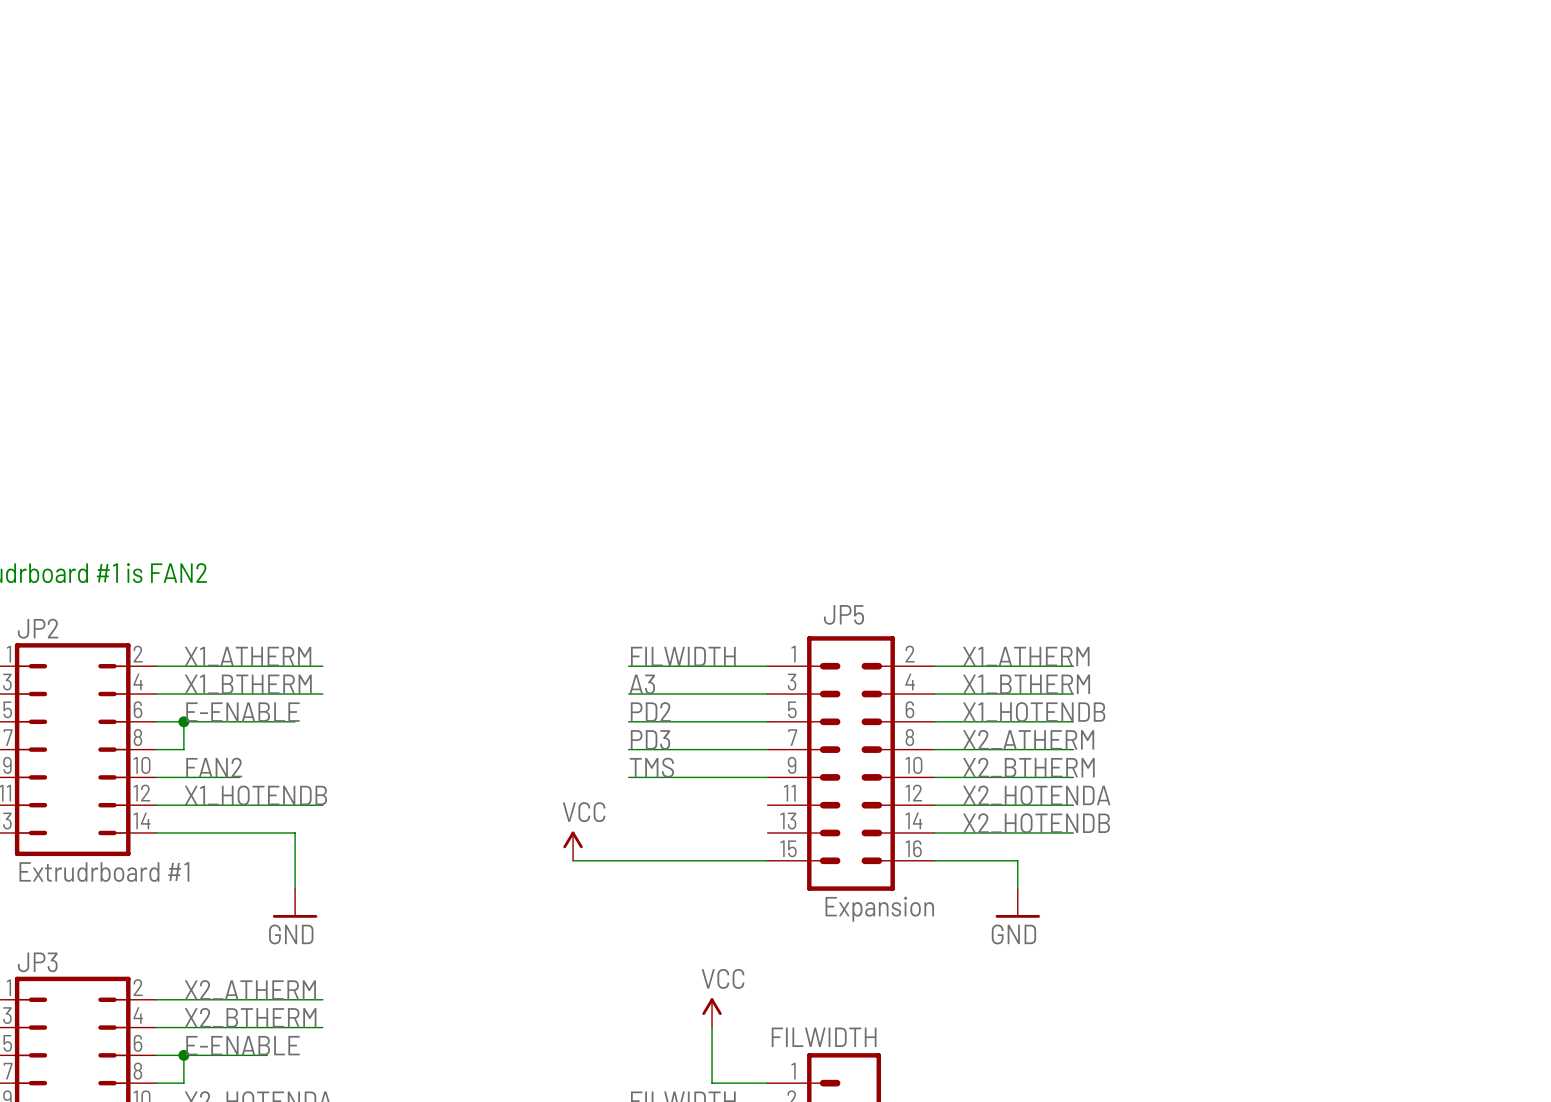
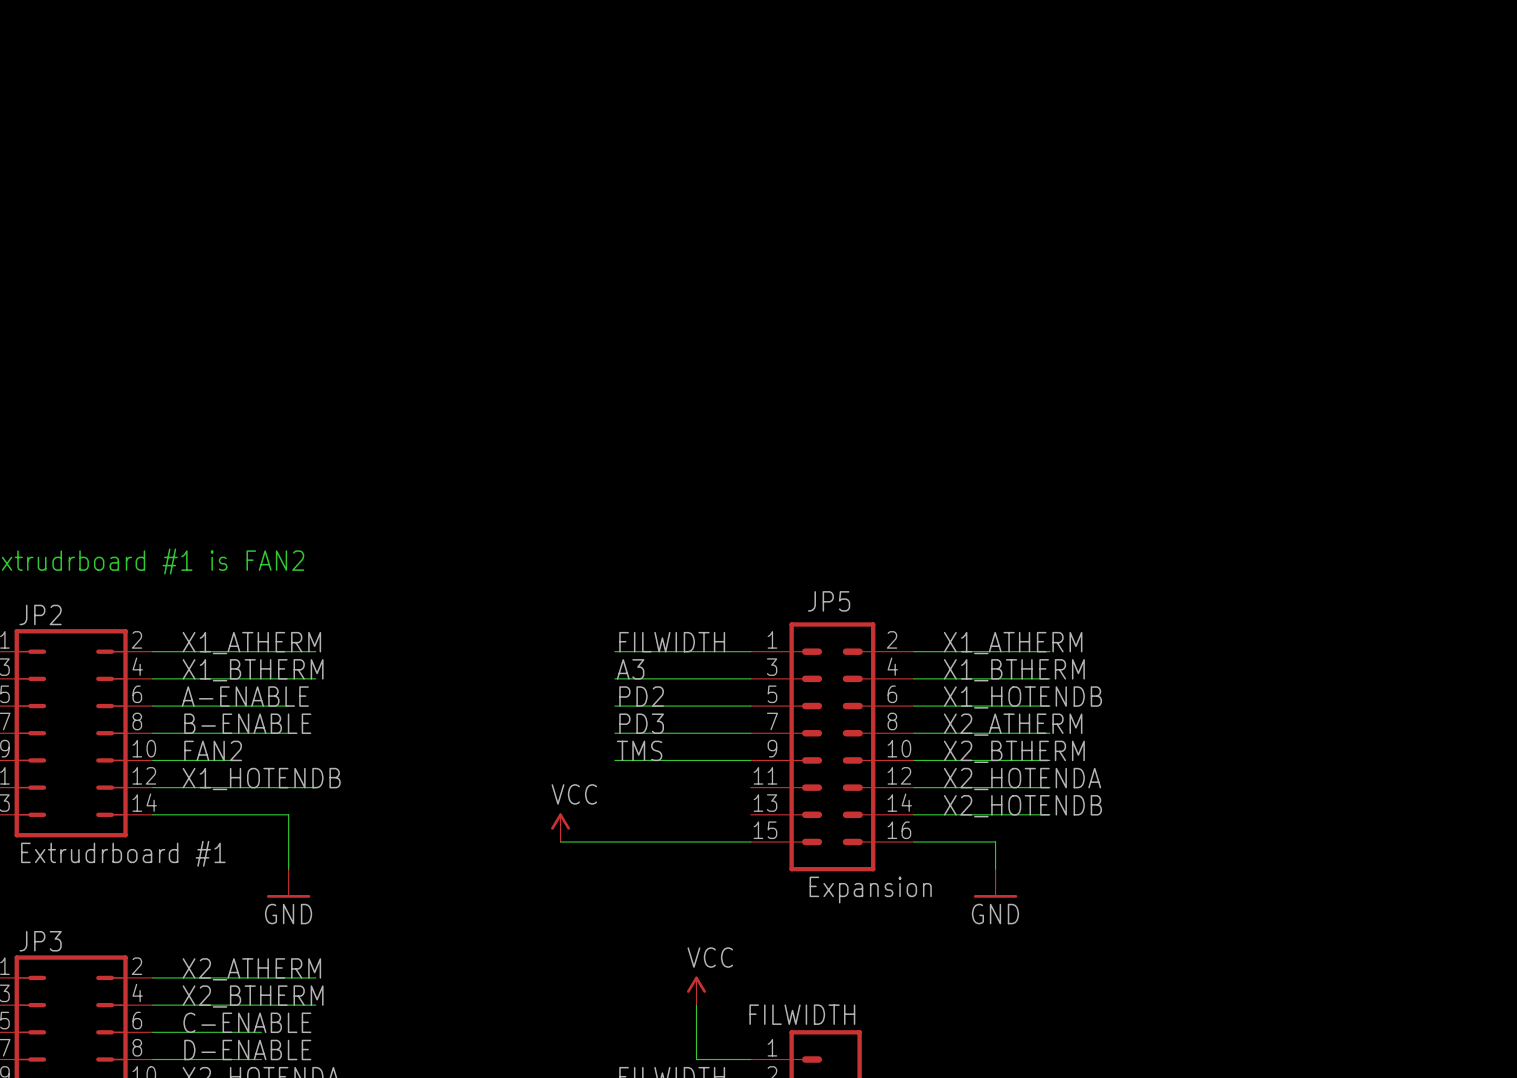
label: E-ENABLE (242, 712) -> A-ENABLE (245, 696)
wire: (183, 721) (183, 749) -> (288, 733) (179, 733)
junction: (183, 721) -> none
label: none -> B-ENABLE (247, 723)
label: E-ENABLE (242, 1045) -> C-ENABLE (247, 1022)
wire: (183, 1055) (183, 1083) -> (261, 1059) (179, 1059)
junction: (183, 1055) -> none
label: none -> D-ENABLE (247, 1050)

